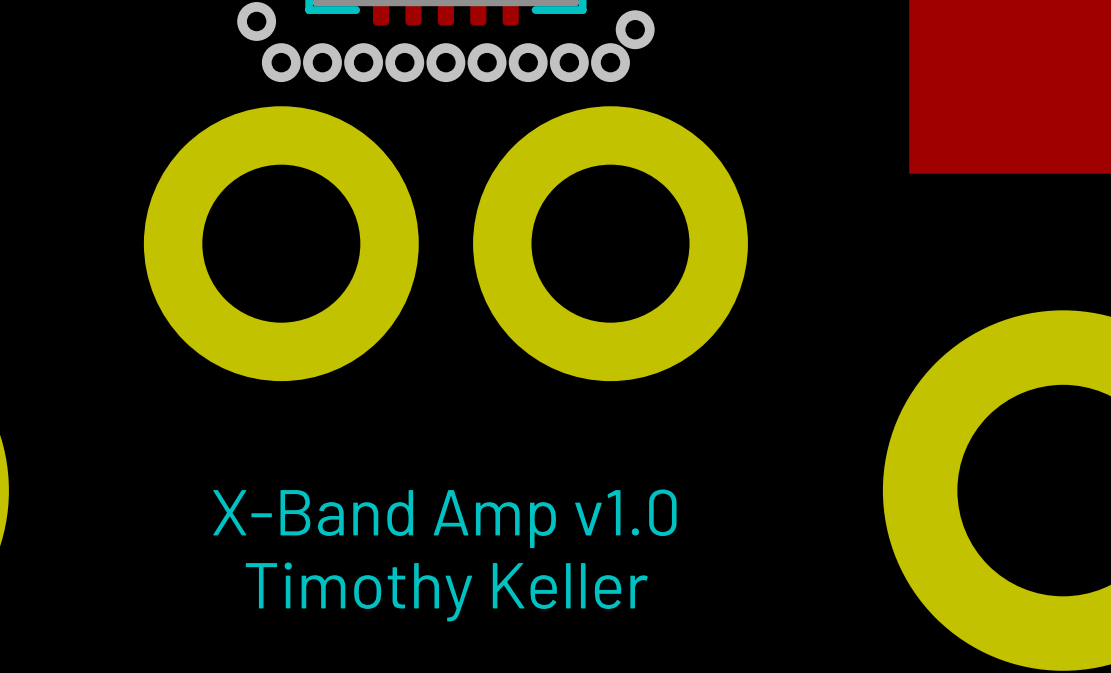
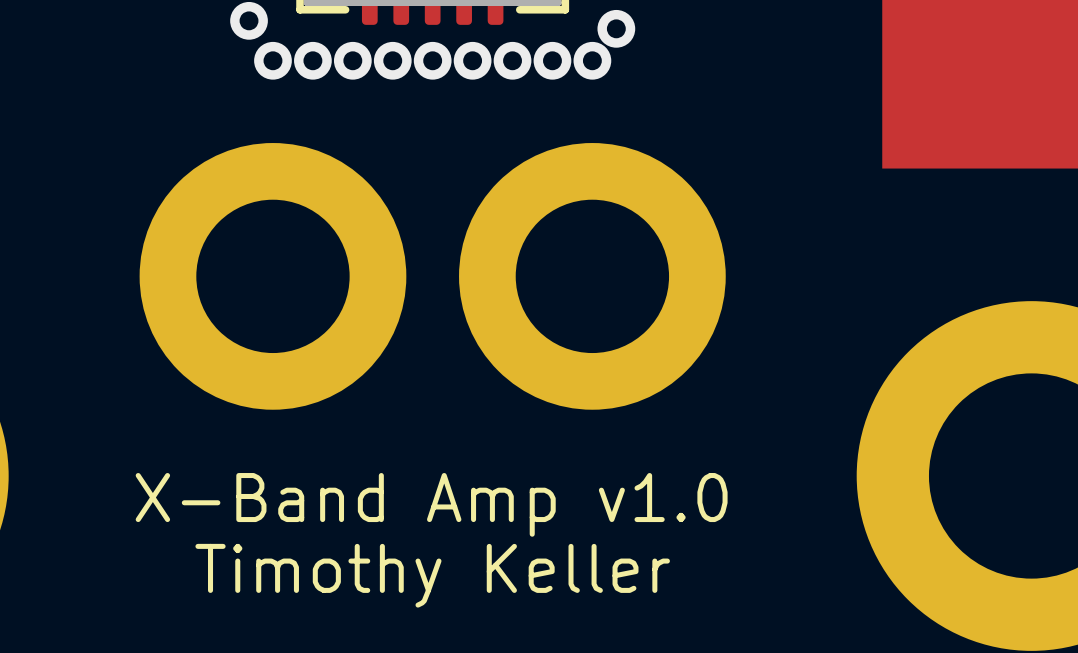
part position: (281, 243) -> (272, 276)
part position: (610, 243) -> (592, 276)

